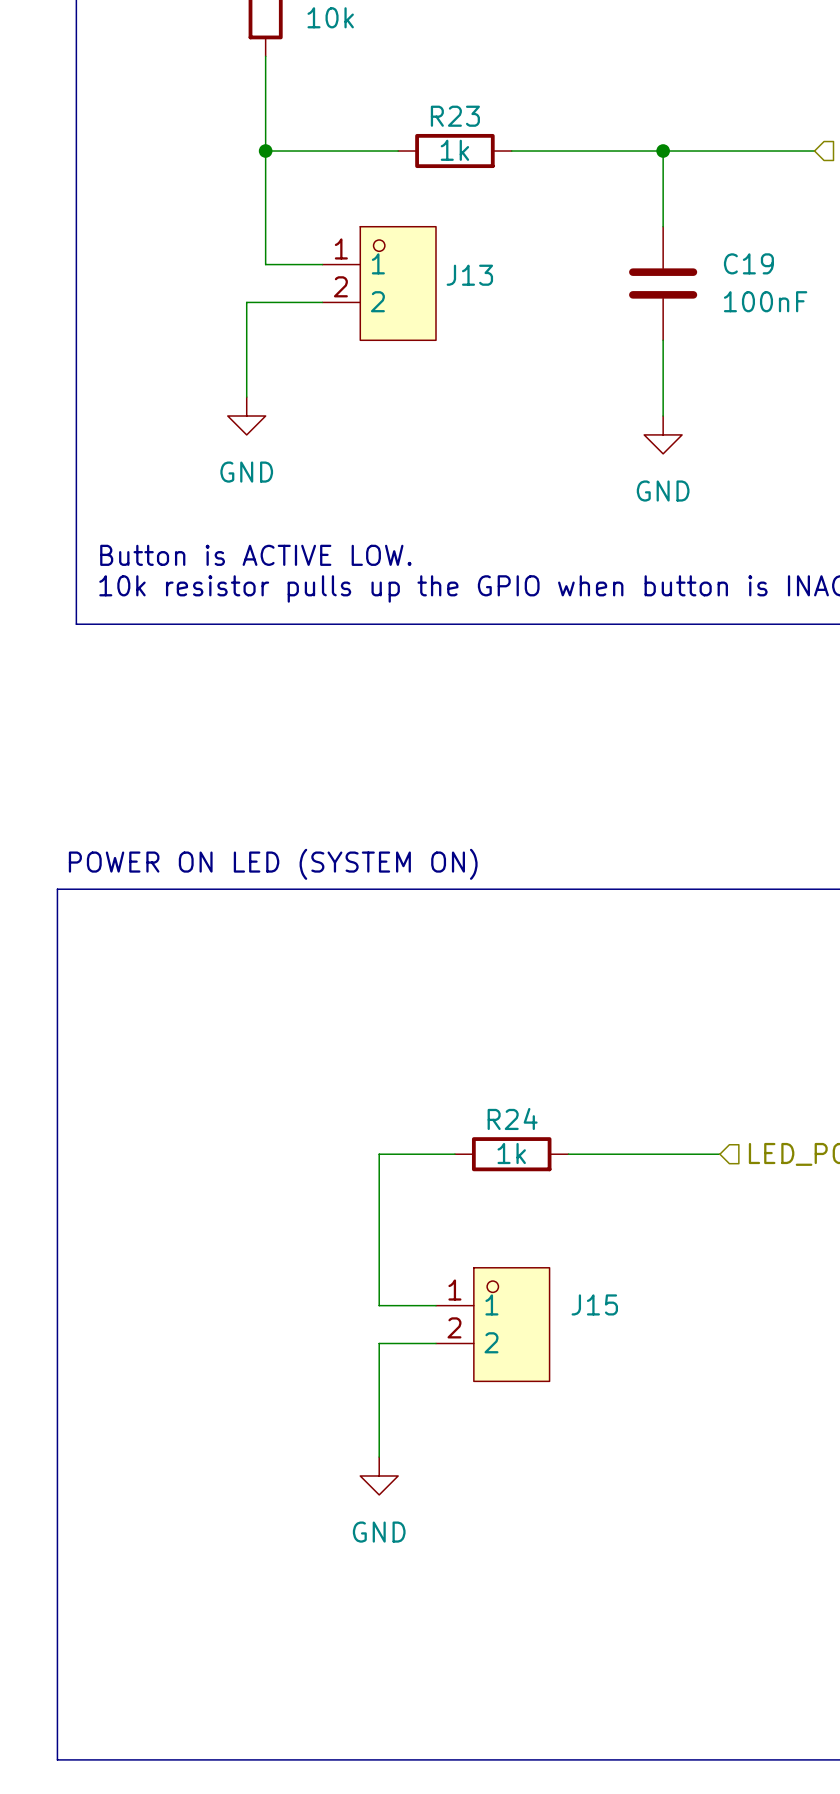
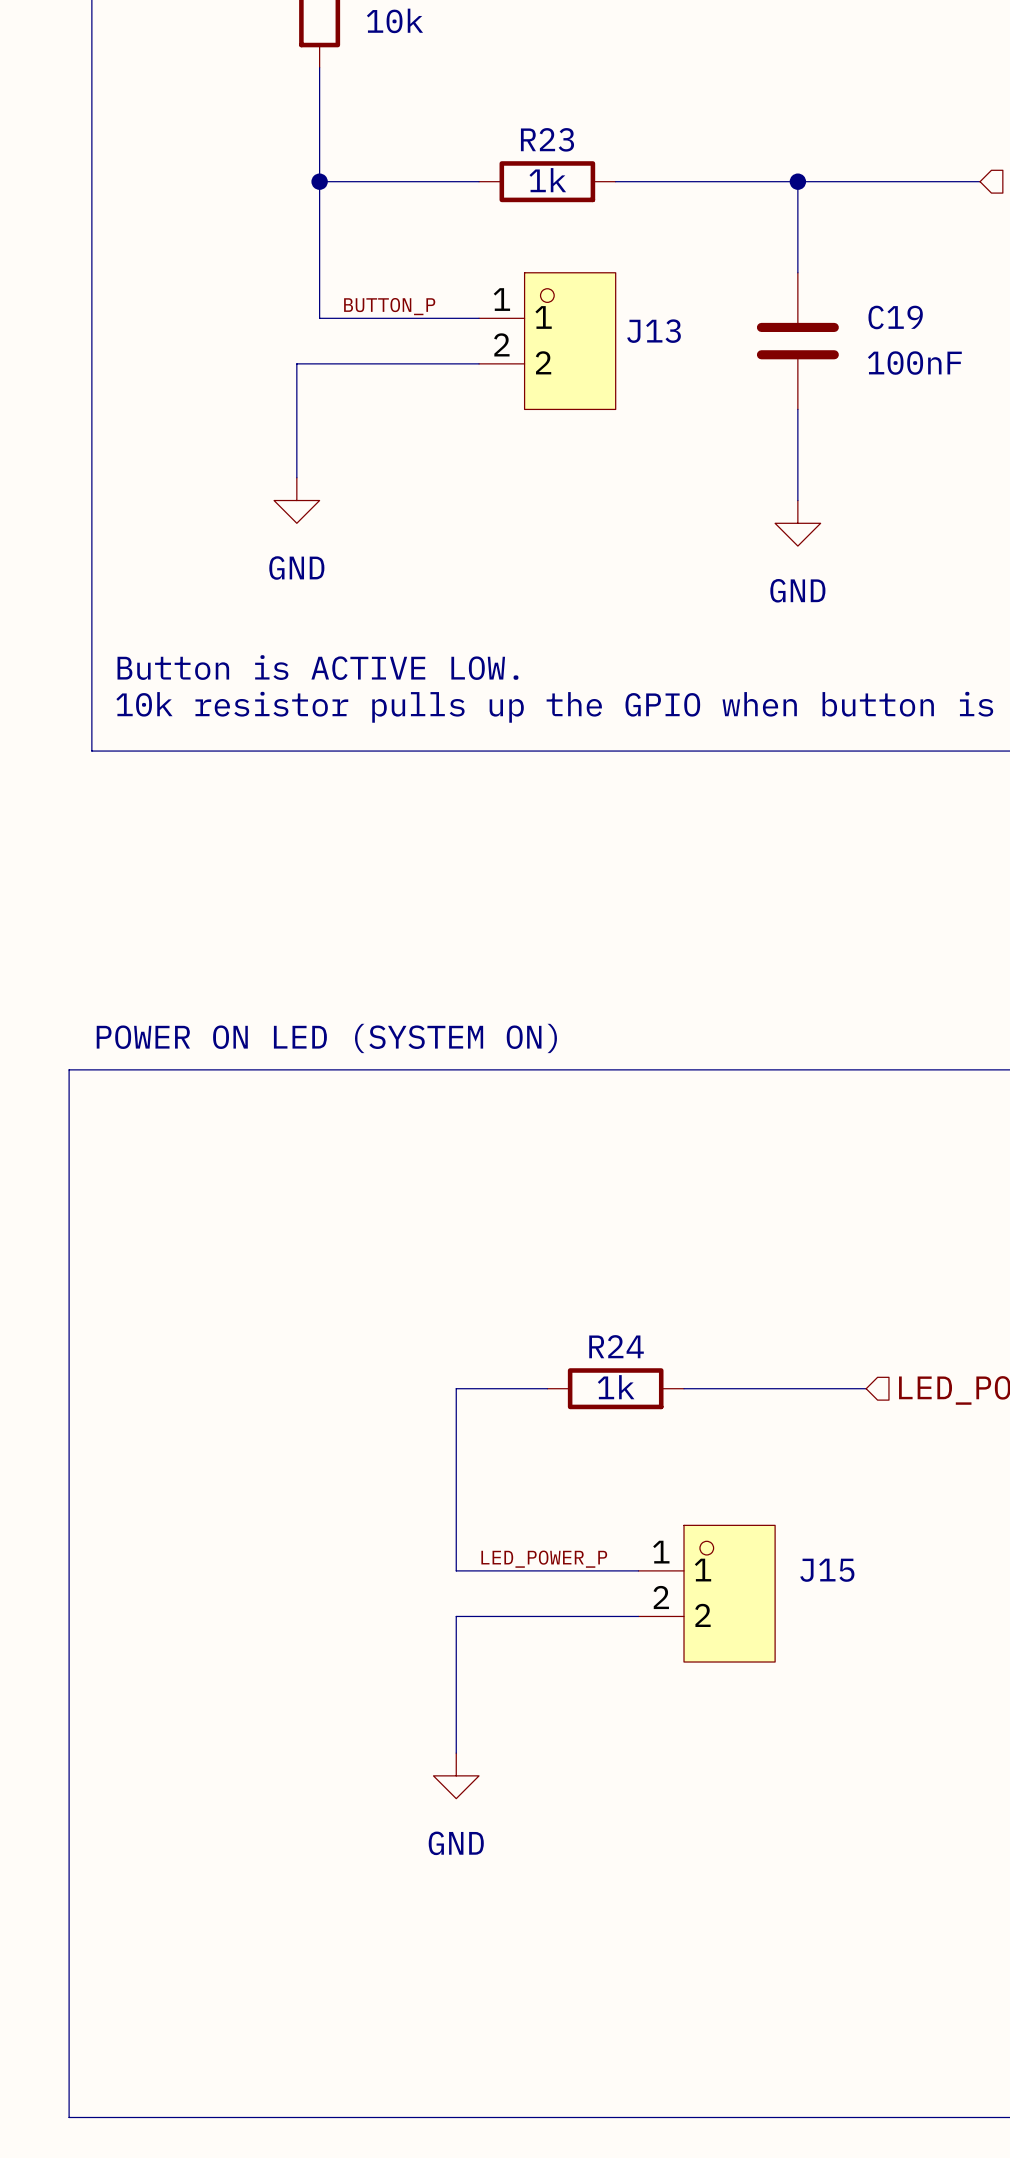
label: none -> BUTTON_P (389, 306)
J13 position: (379, 283) -> (547, 341)
label: none -> LED_POWER_P (544, 1559)
J15 position: (492, 1324) -> (706, 1593)

